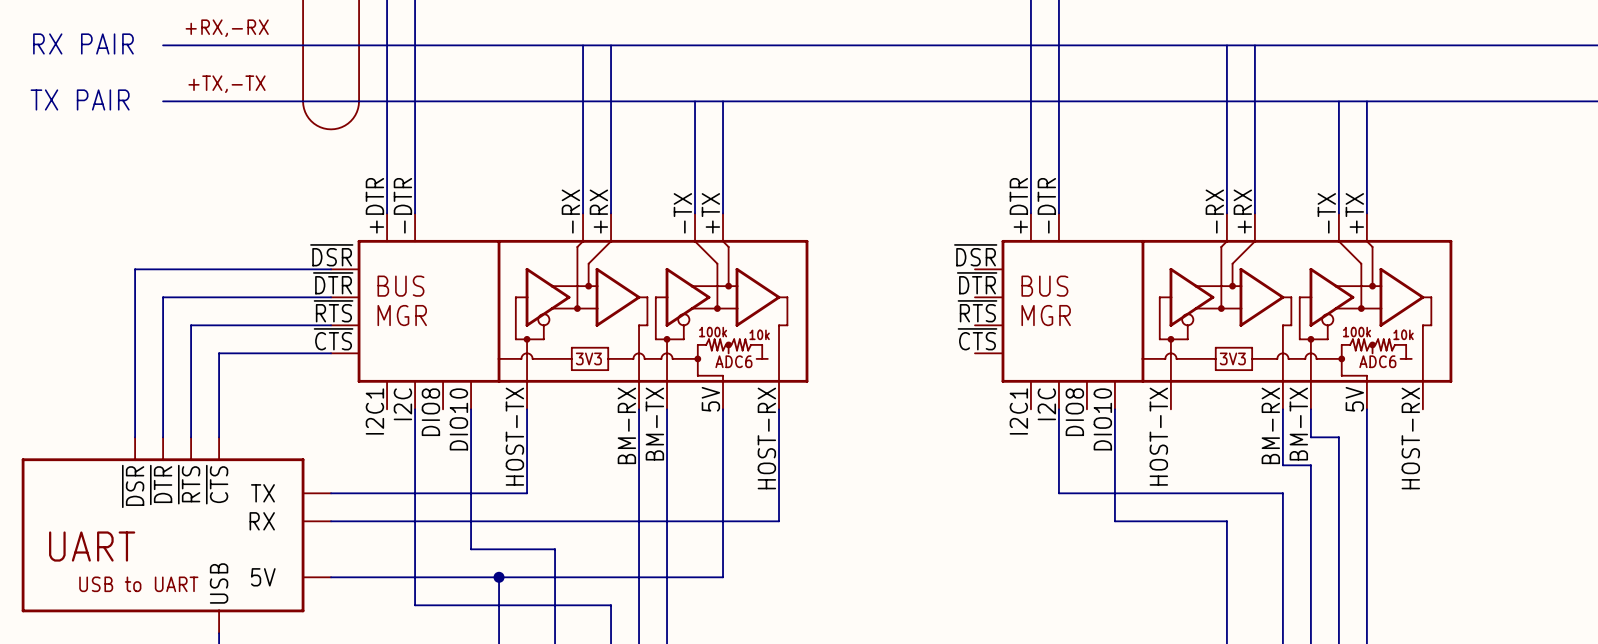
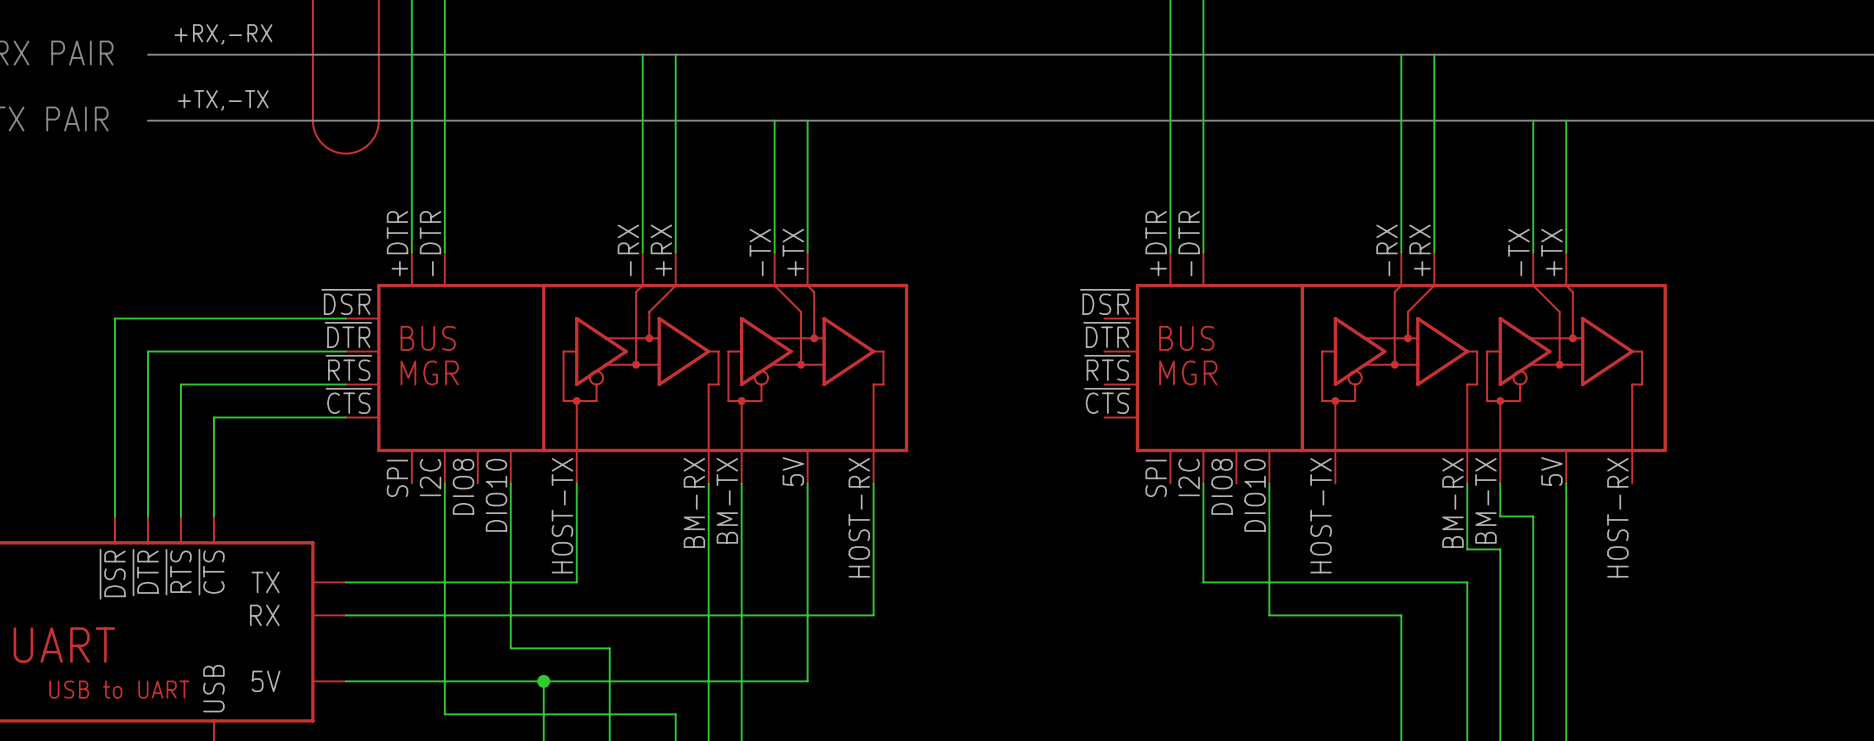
part symbol: [331, 213, 809, 410] -> [345, 252, 909, 484]
part symbol: [974, 213, 1453, 410] -> [1104, 252, 1667, 484]

